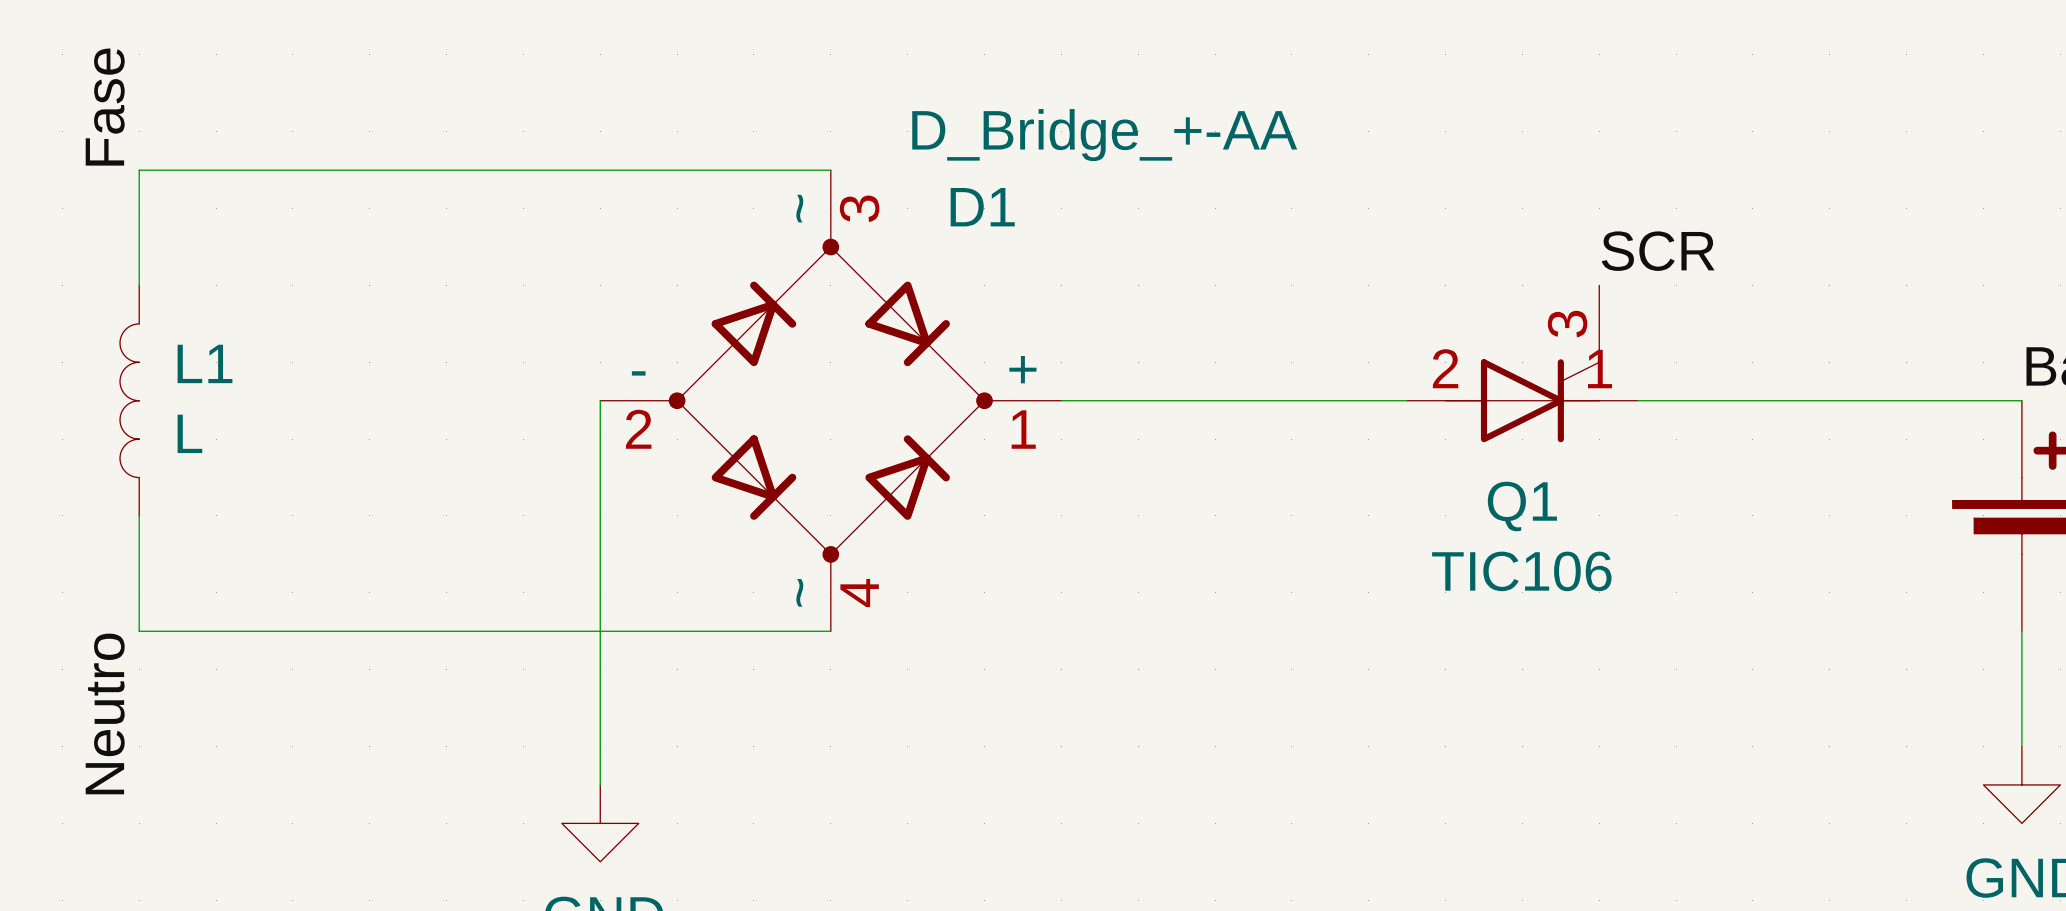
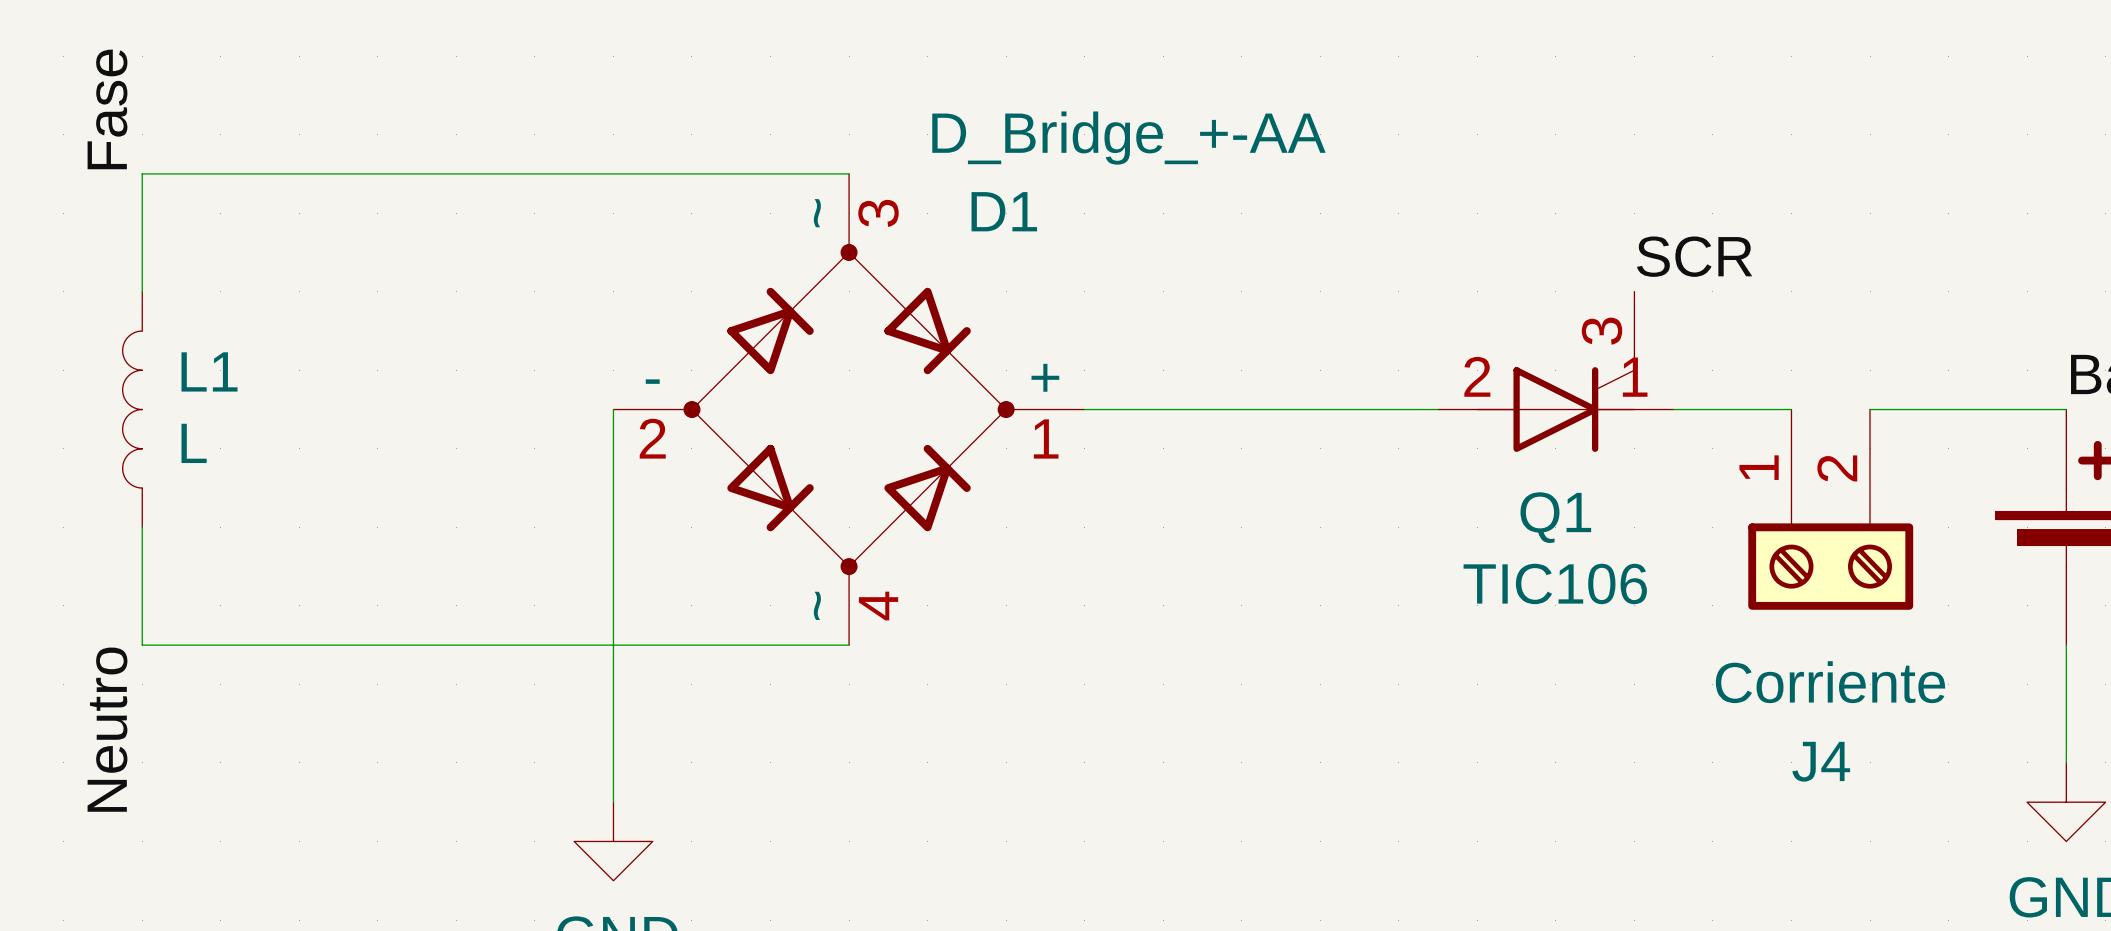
wire: (1752, 400) (1829, 400) -> none
J4: none -> Corriente (1830, 509)

